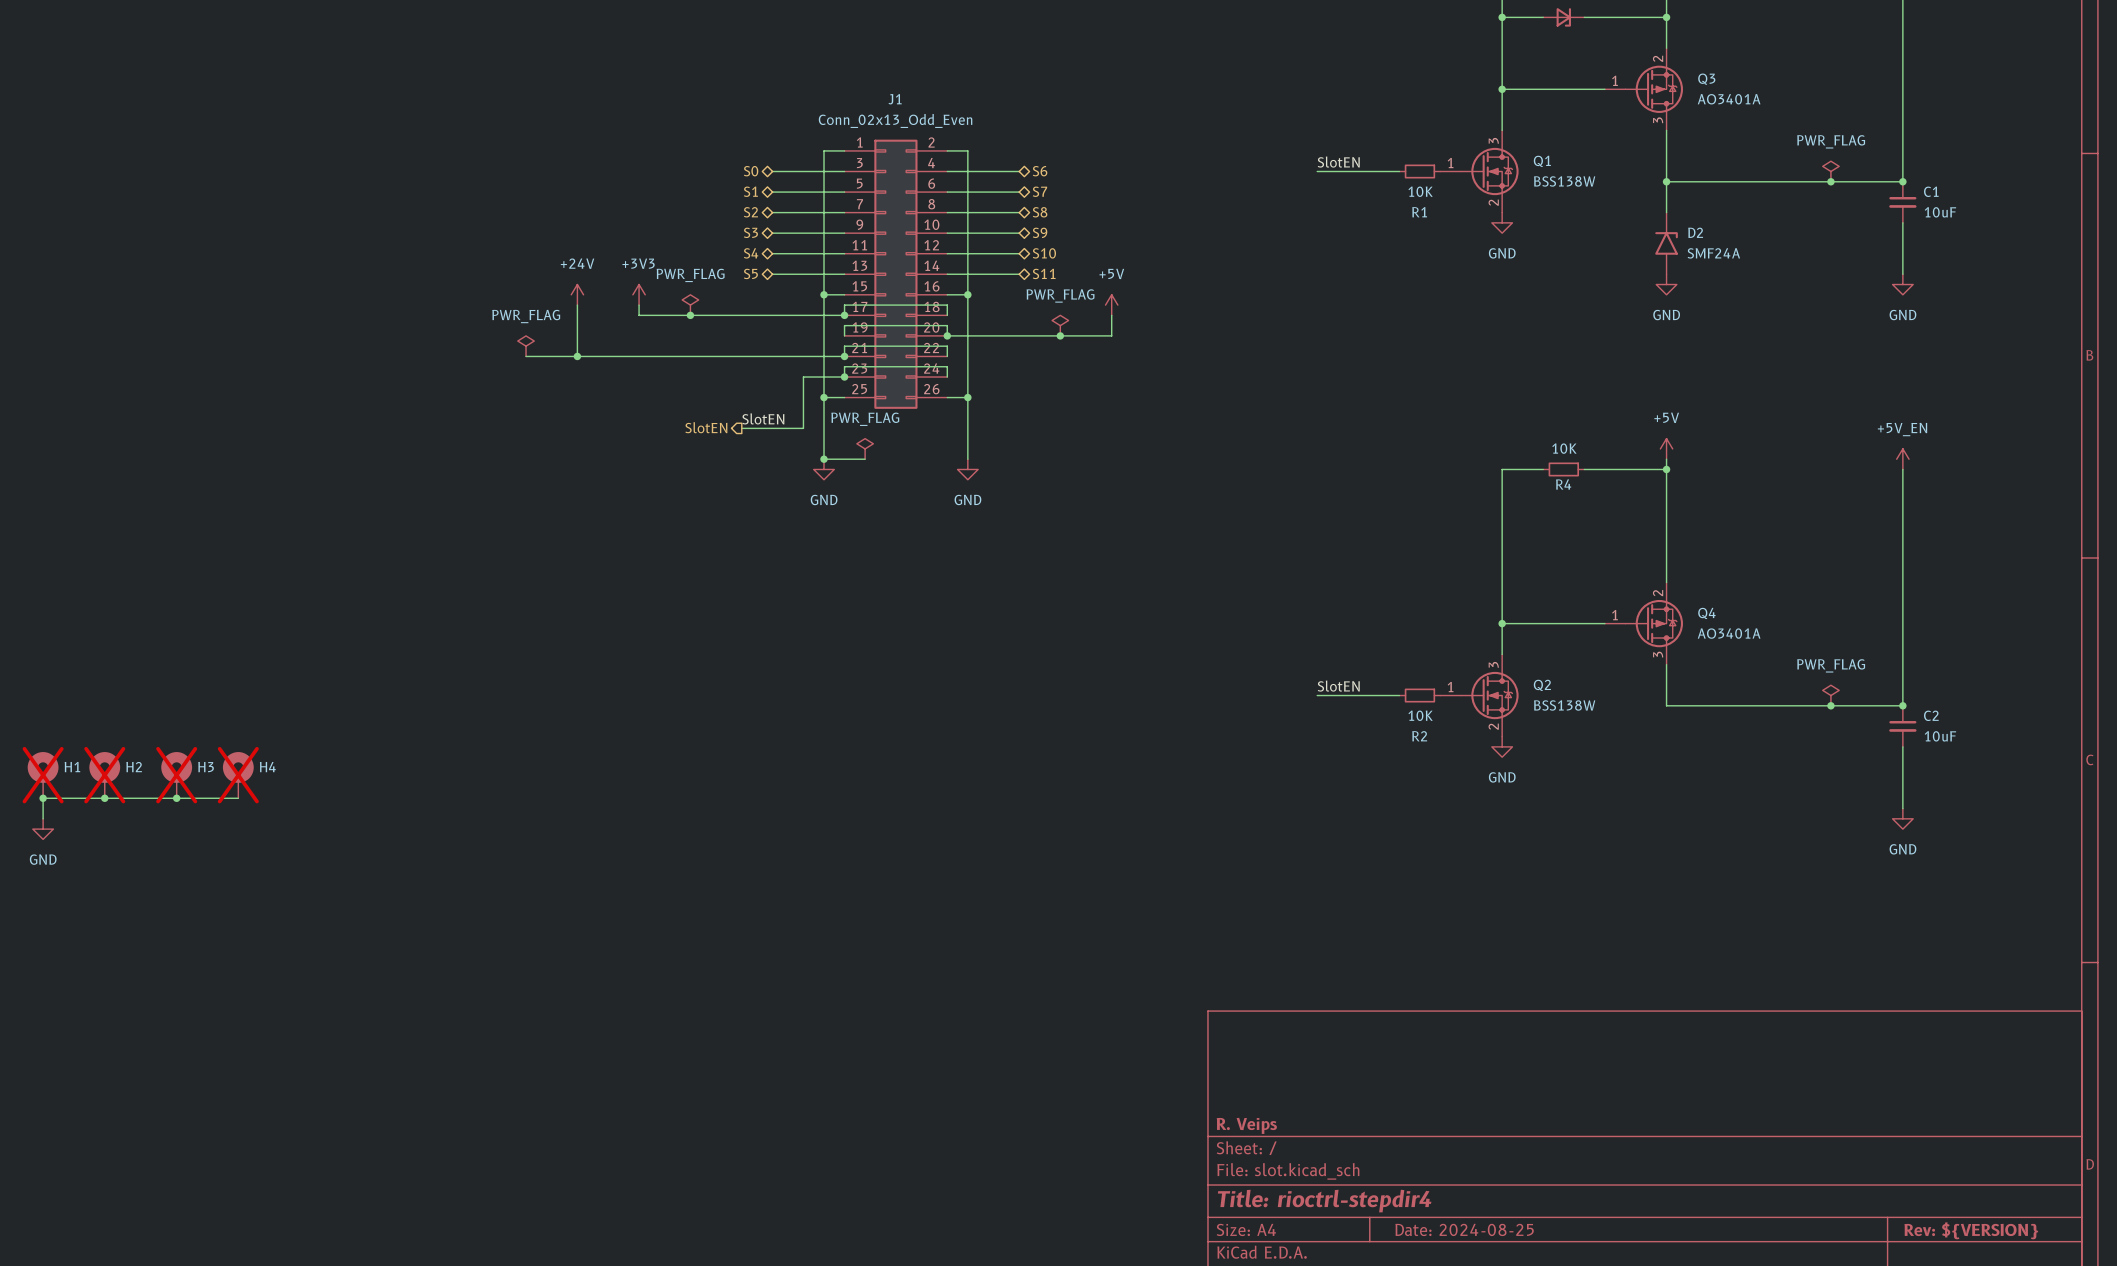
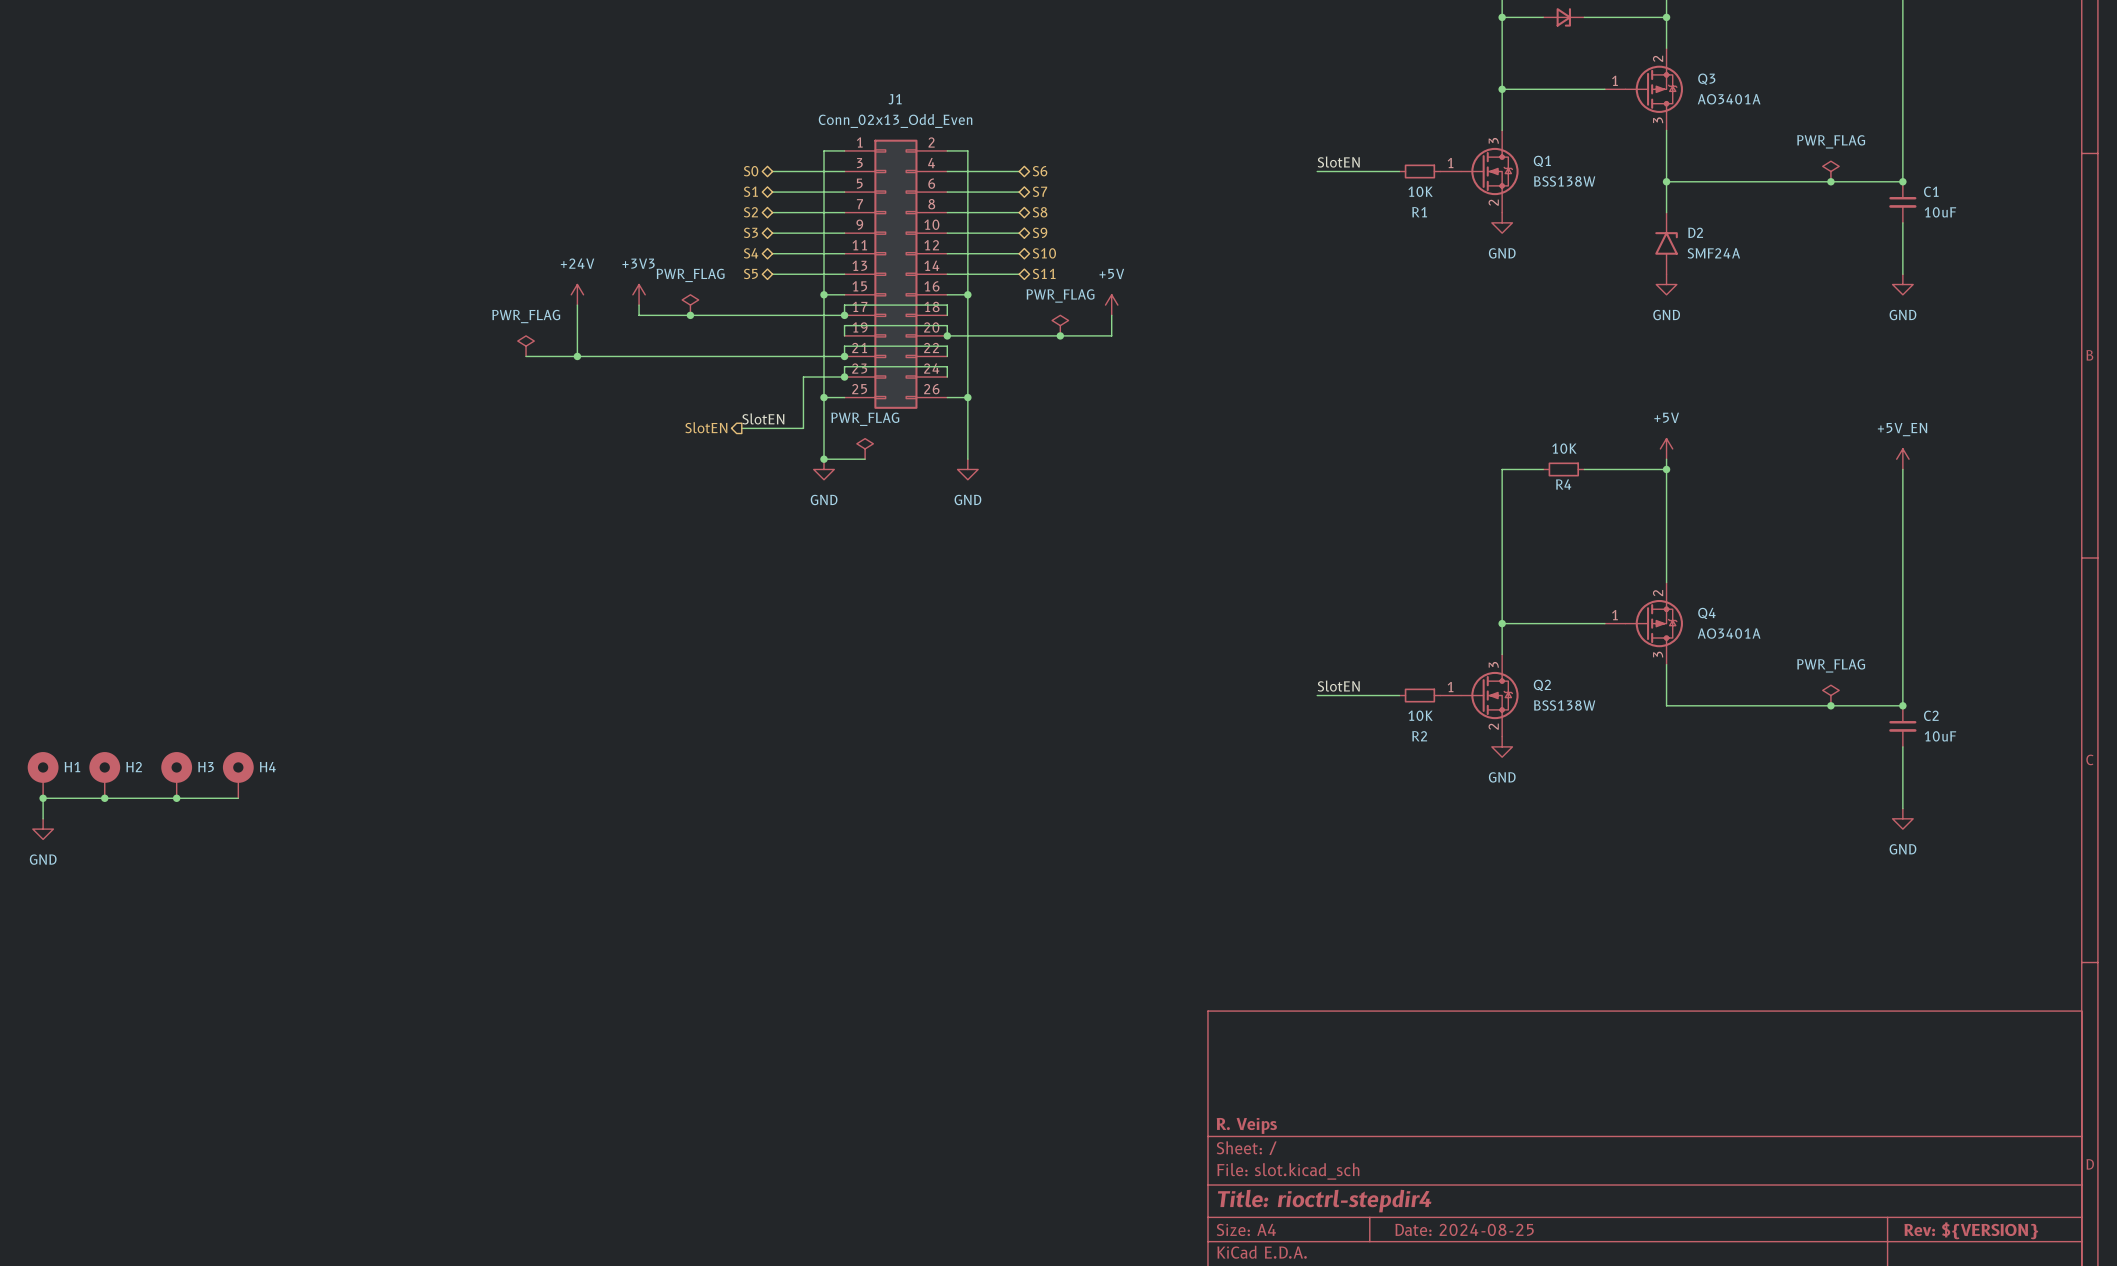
H1 do-not-place cross: (43, 775) -> none
H2 do-not-place cross: (104, 775) -> none
H3 do-not-place cross: (176, 775) -> none
H4 do-not-place cross: (238, 775) -> none

